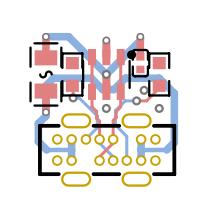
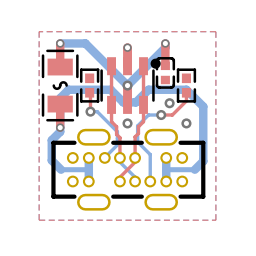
top zone outline: none -> (39, 31) (215, 31) (215, 220) (39, 220) (39, 31)
part footprint: [61, 52, 84, 97] -> [79, 68, 100, 103]
part footprint: [148, 52, 171, 97] -> [176, 68, 197, 103]

